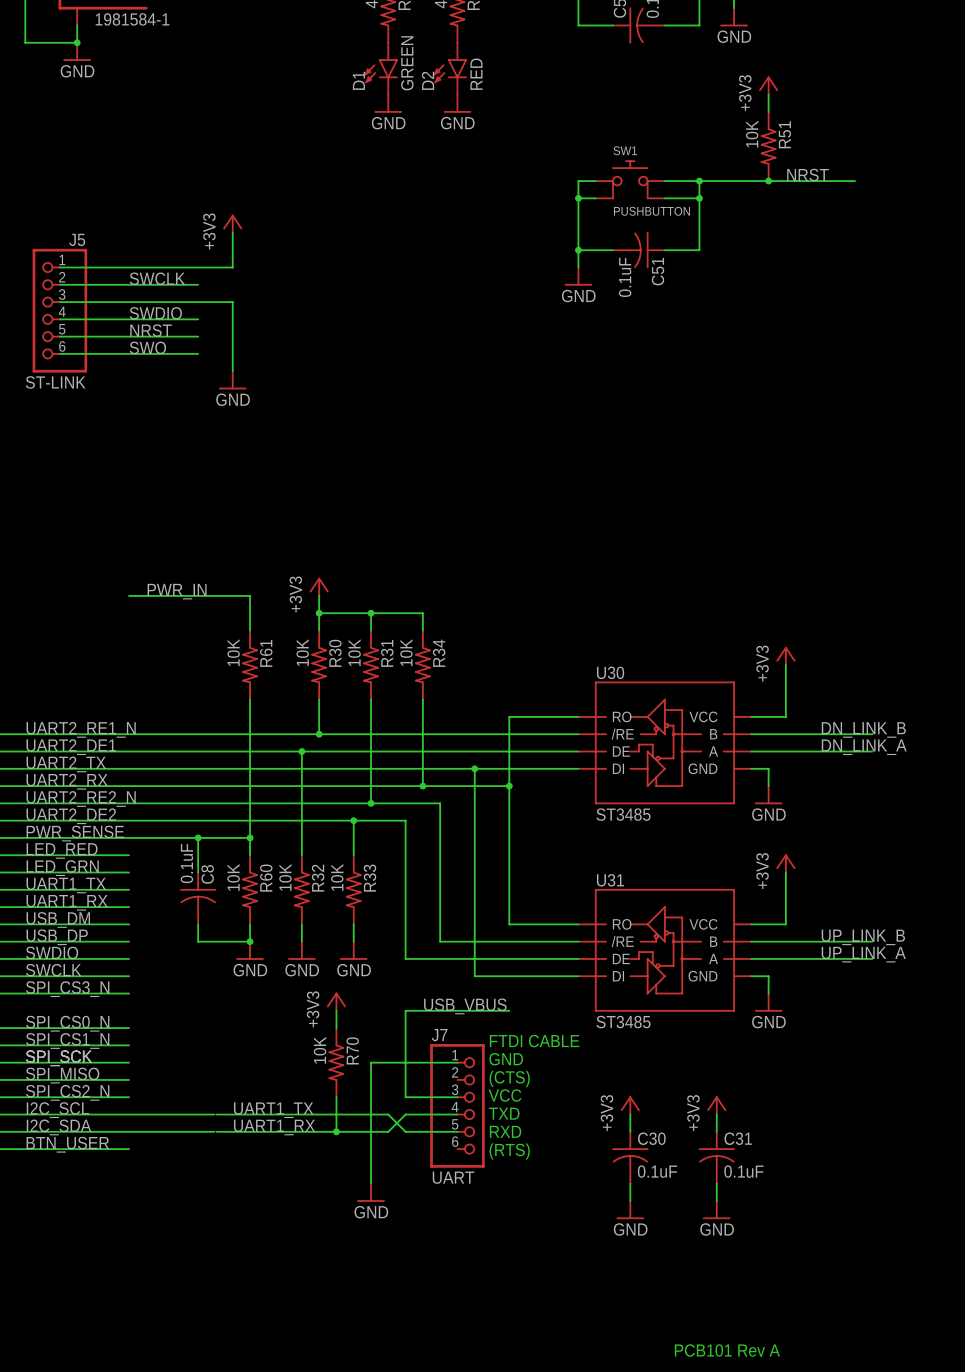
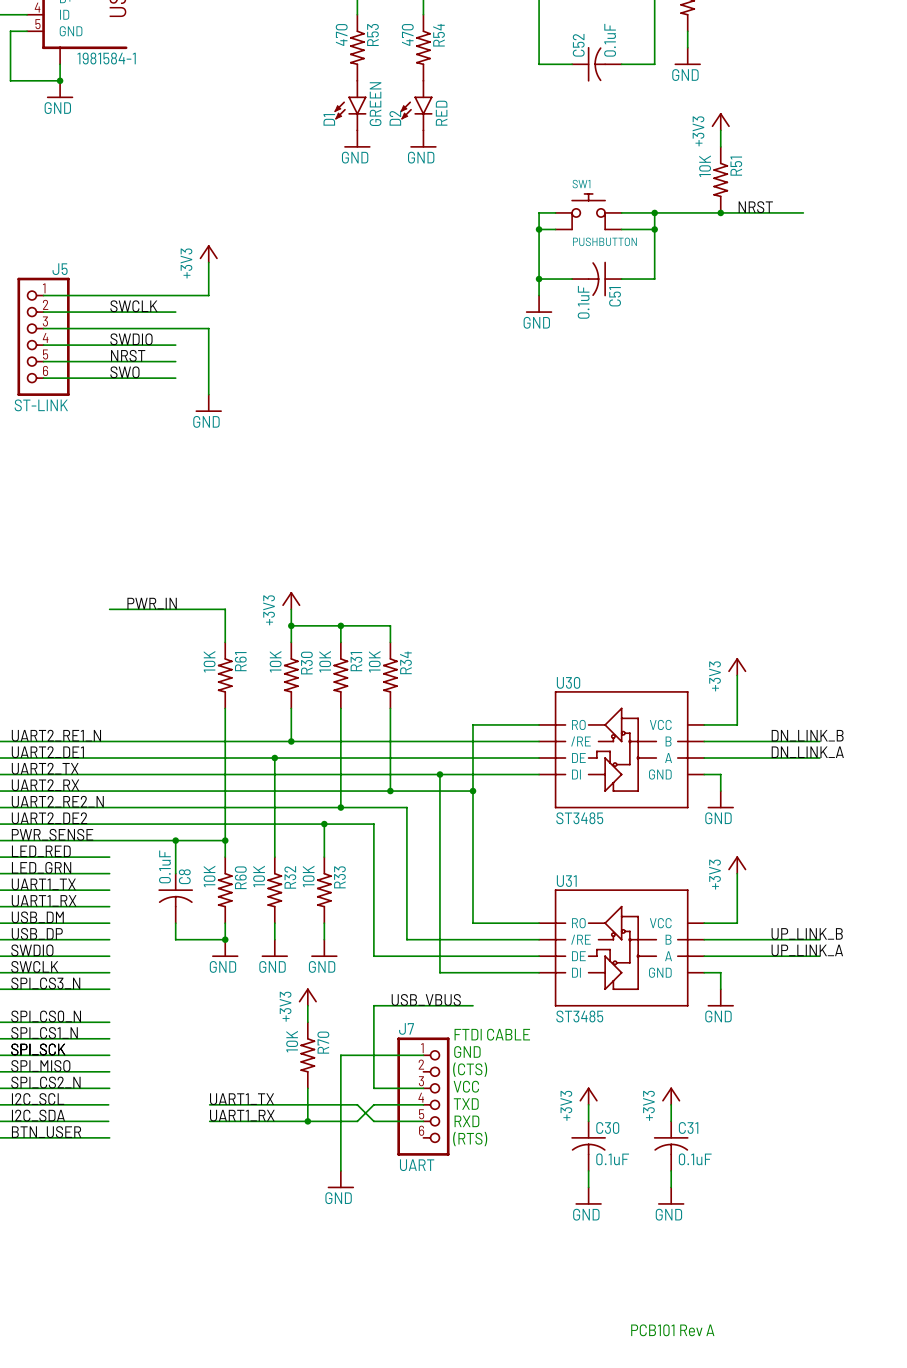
wire: (127, 1114) (214, 1114) -> none
wire: (216, 1114) (233, 1114) -> none
wire: (127, 1131) (214, 1131) -> none
wire: (216, 1131) (233, 1131) -> none

